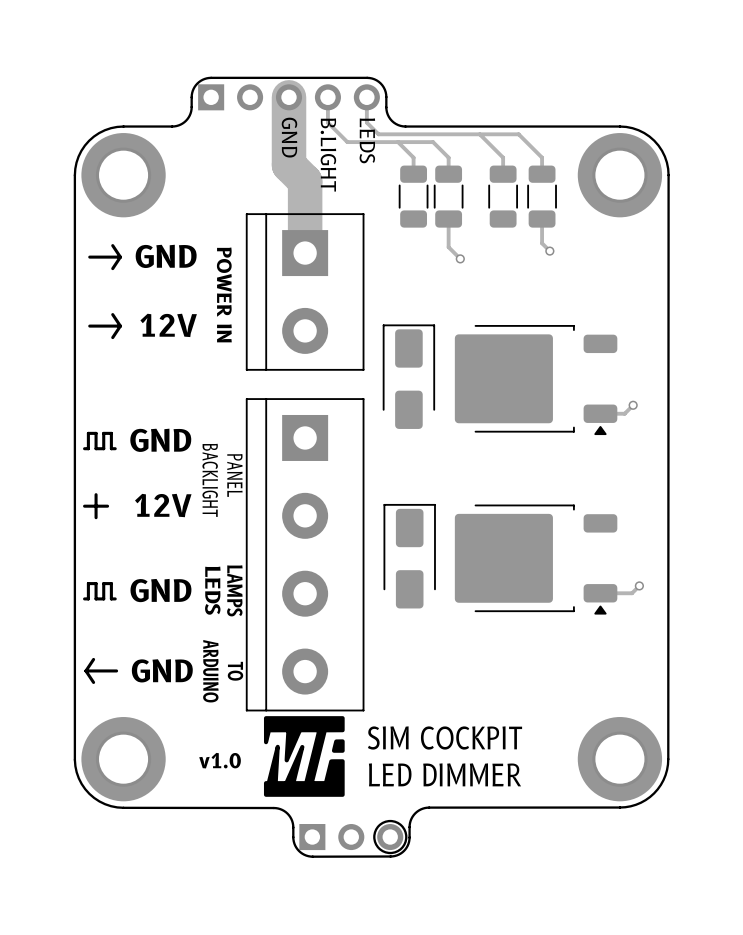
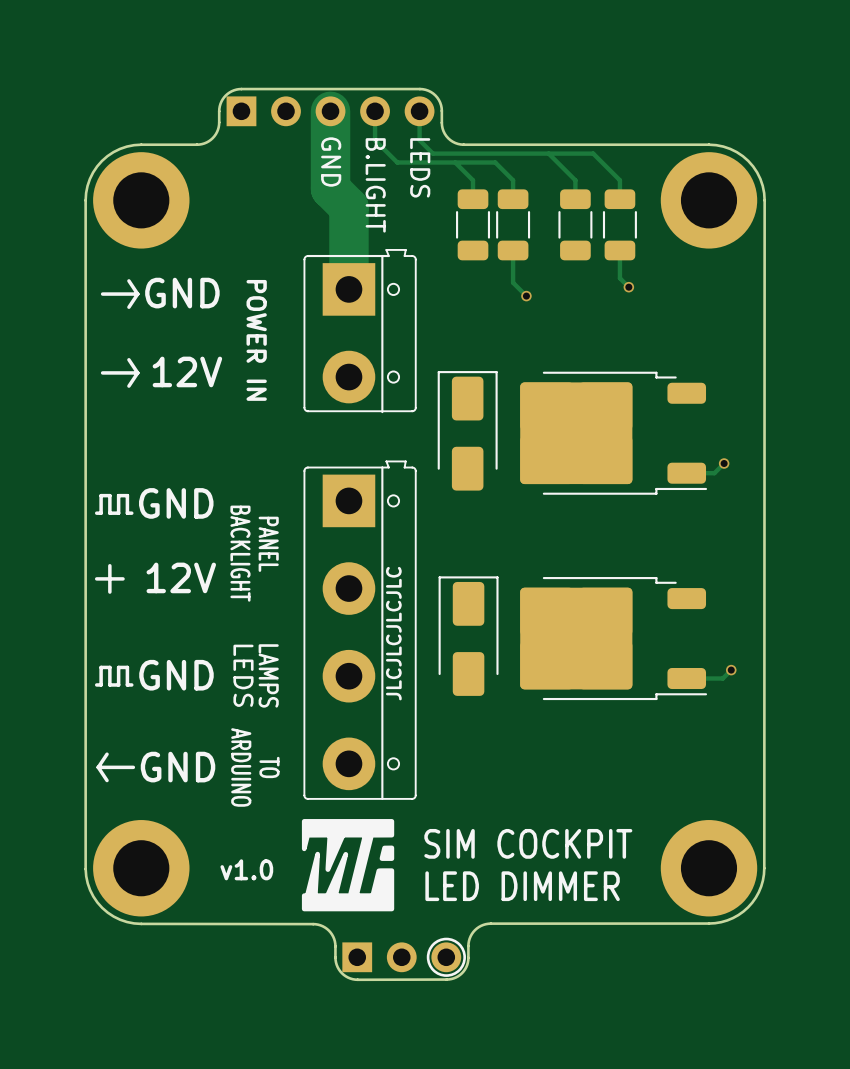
part footprint: [245, 213, 365, 371] -> [303, 249, 417, 414]
part footprint: [454, 325, 618, 436] -> [520, 371, 708, 495]
part footprint: [245, 398, 365, 712] -> [303, 460, 417, 800]
part footprint: [454, 504, 618, 615] -> [520, 577, 708, 701]
text: none -> JLCJLCJLCJLC (393, 633)

